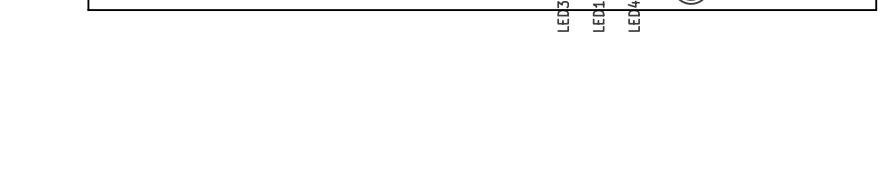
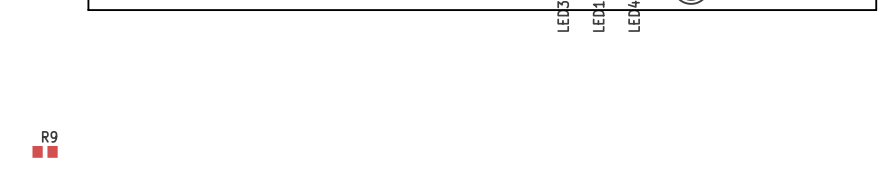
R9: none -> (45, 151)

